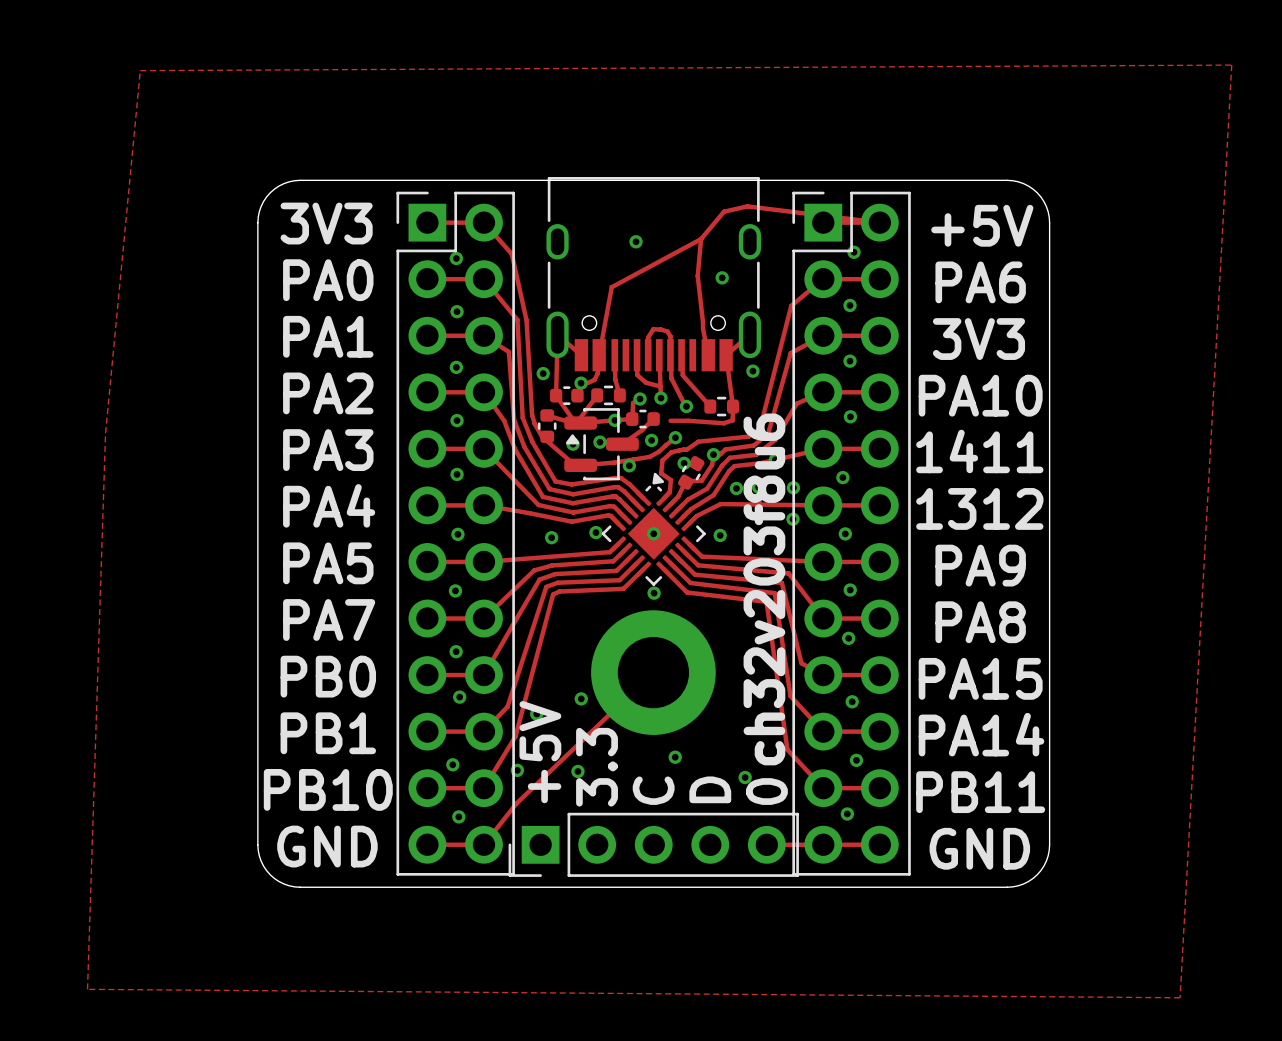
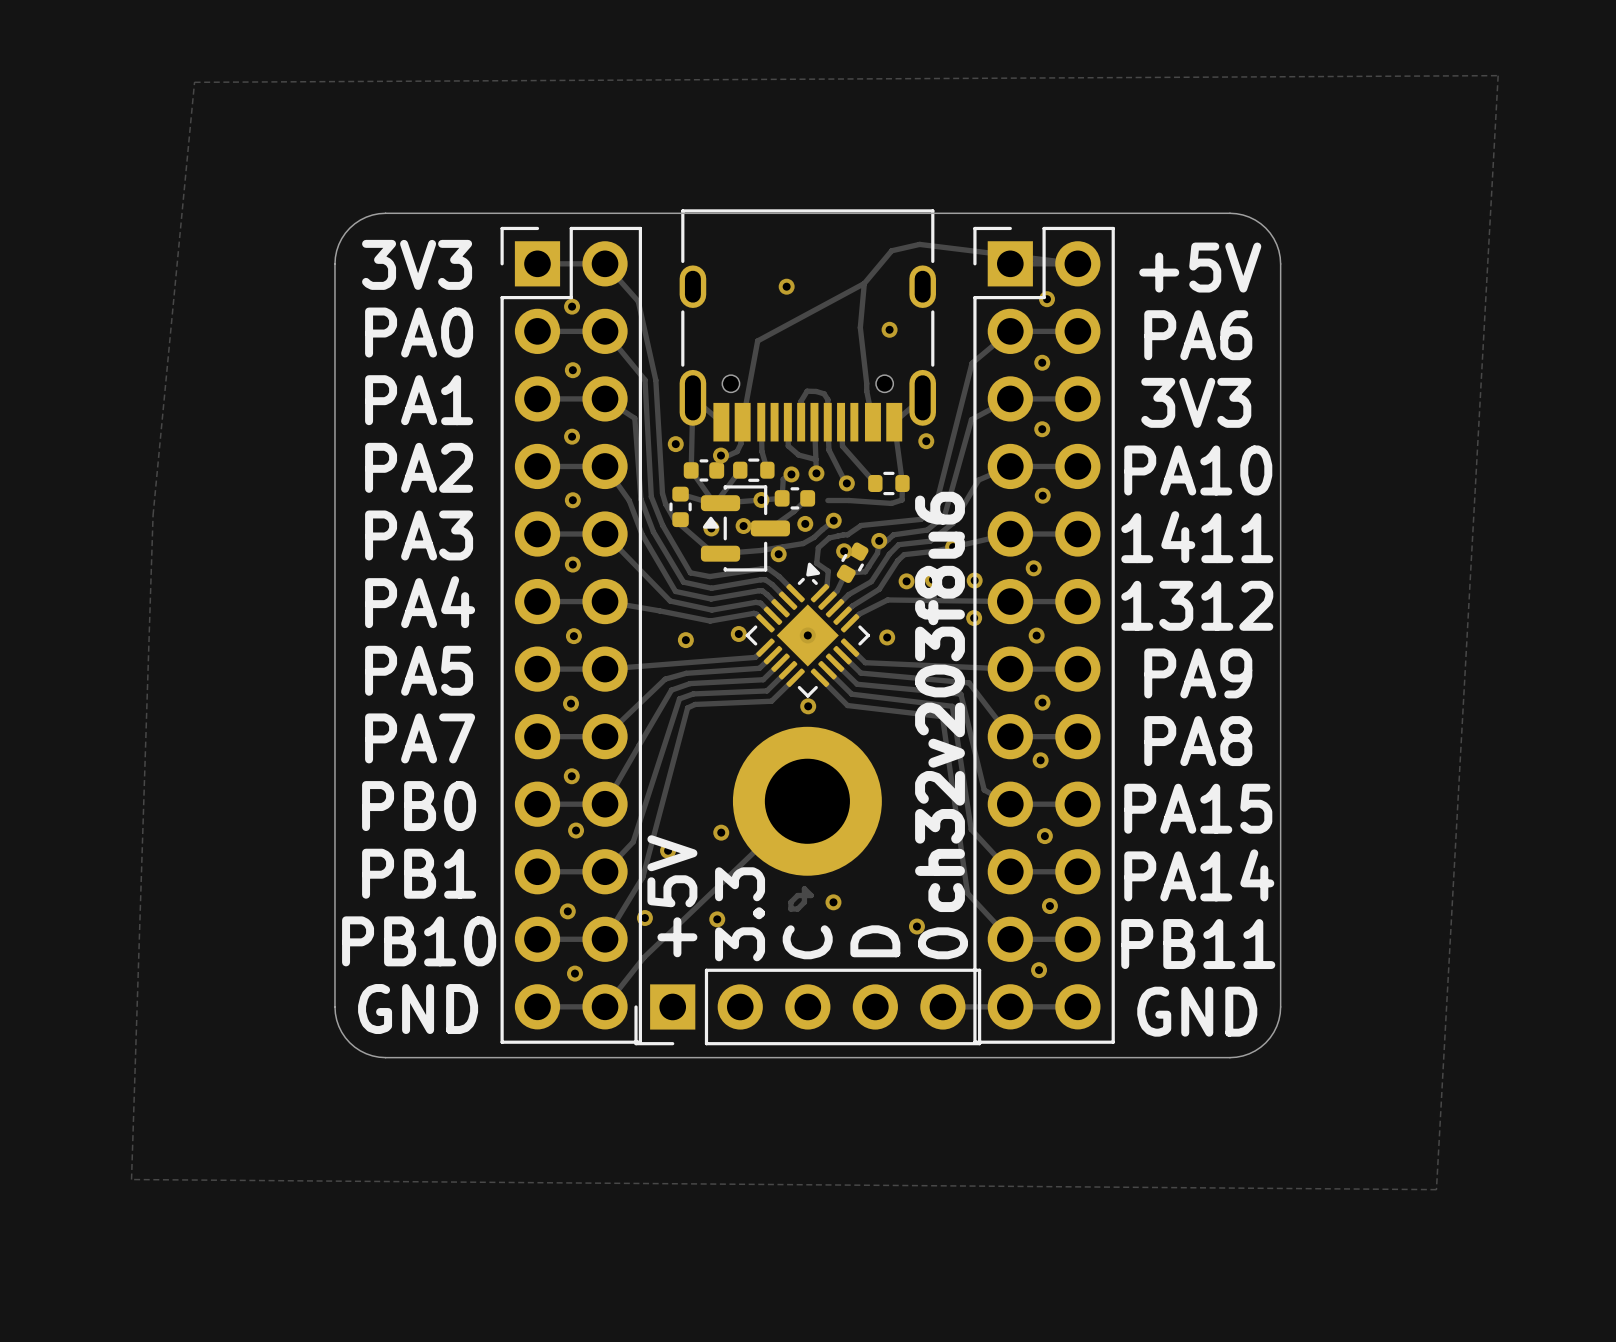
track: none -> (804, 888) (804, 902) (797, 909) (790, 909) (790, 902) (797, 895) (811, 895) (804, 888)

